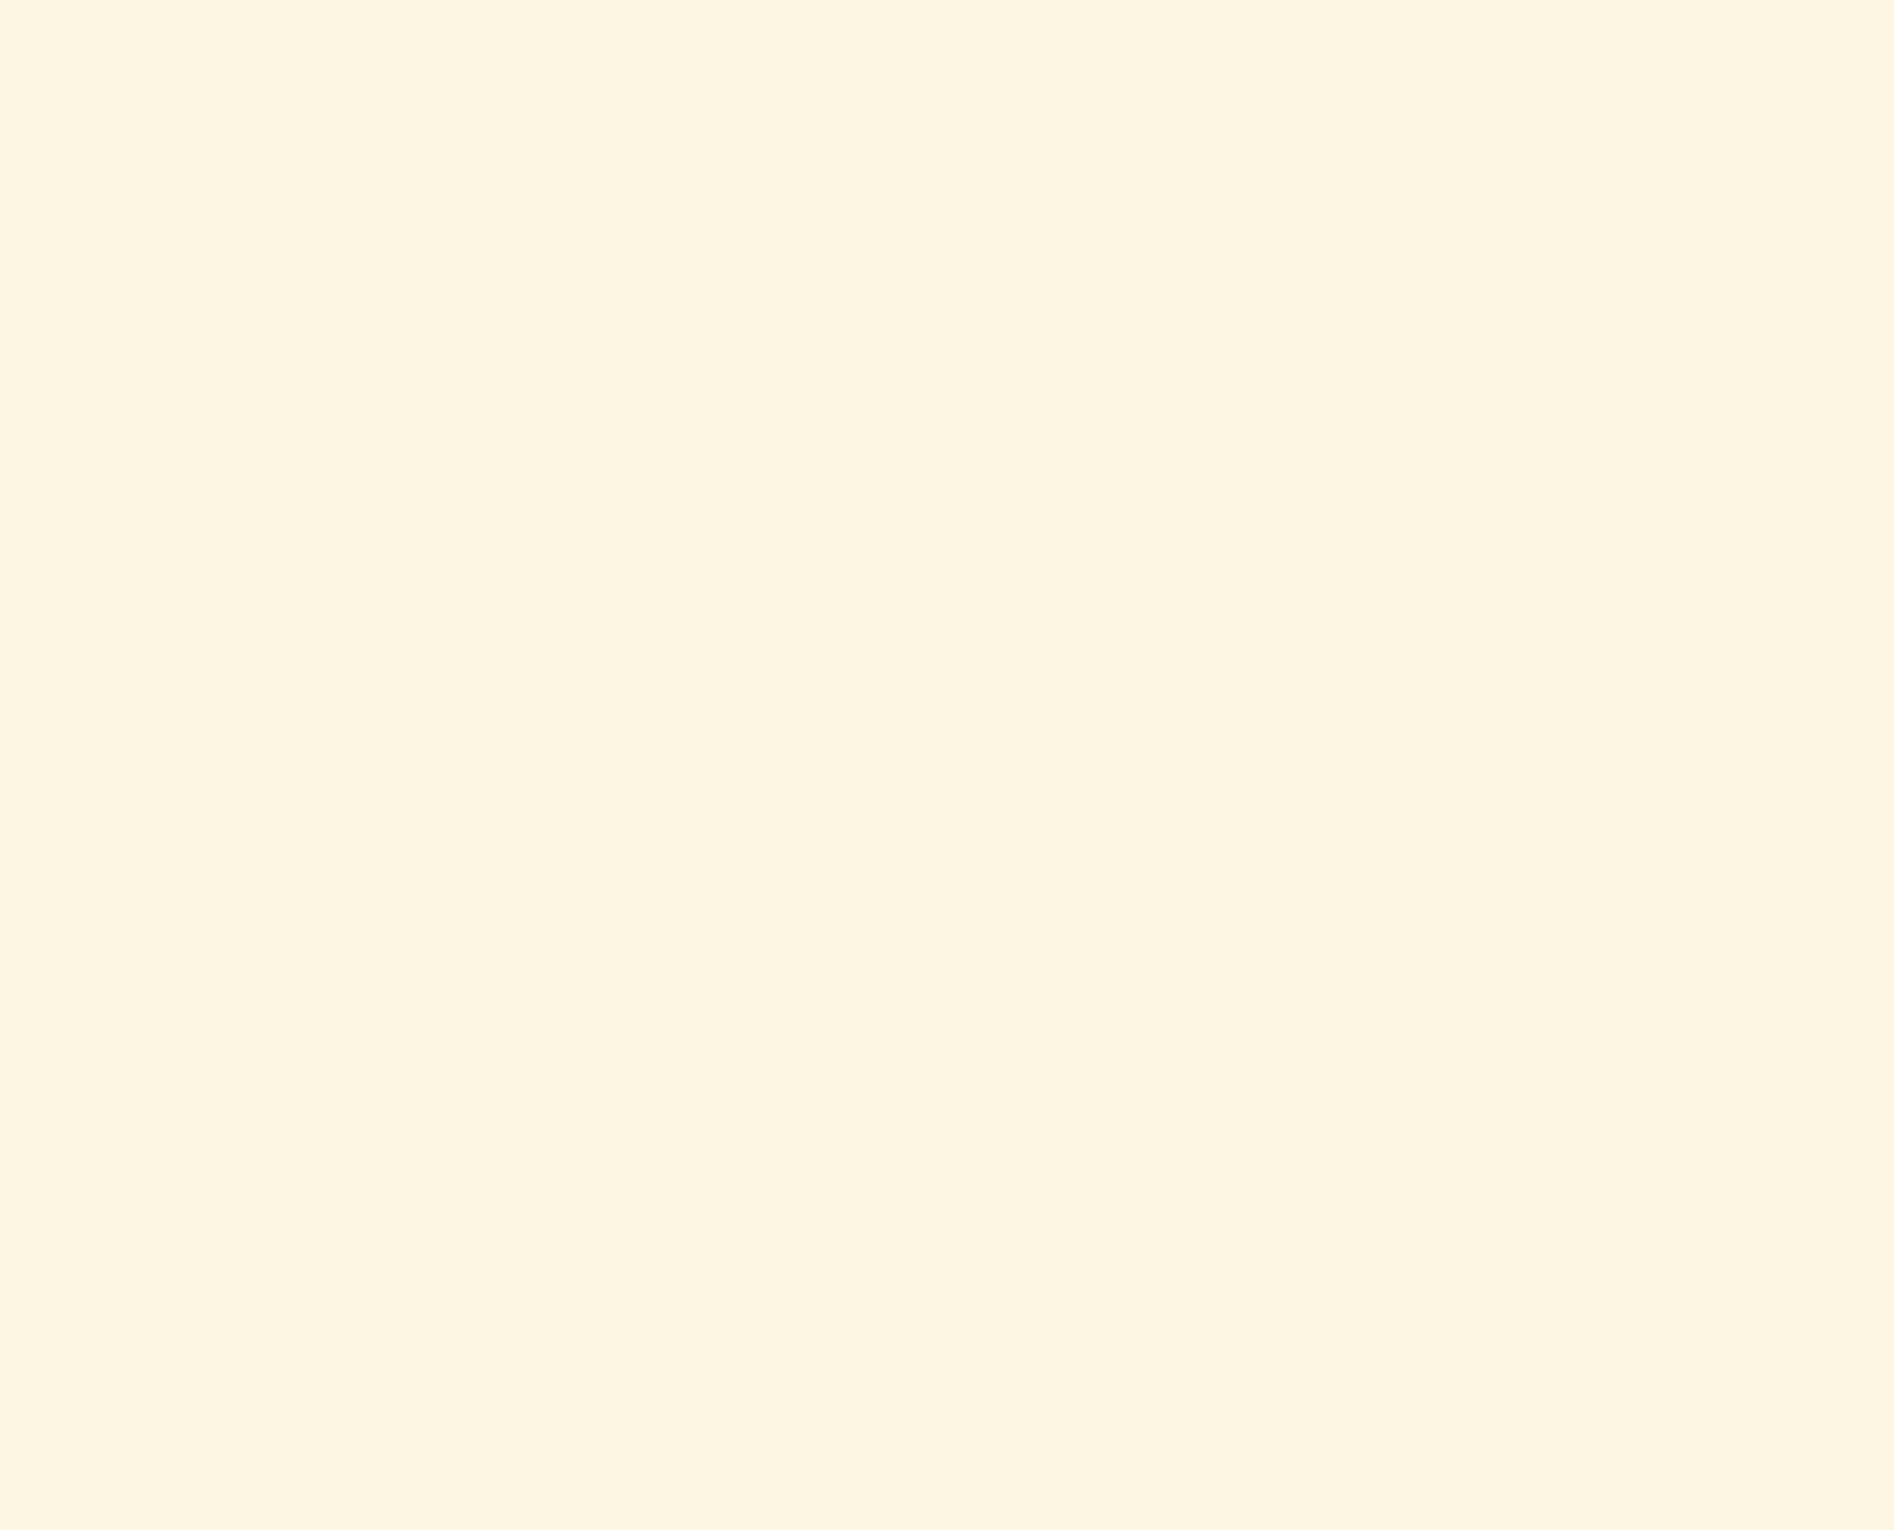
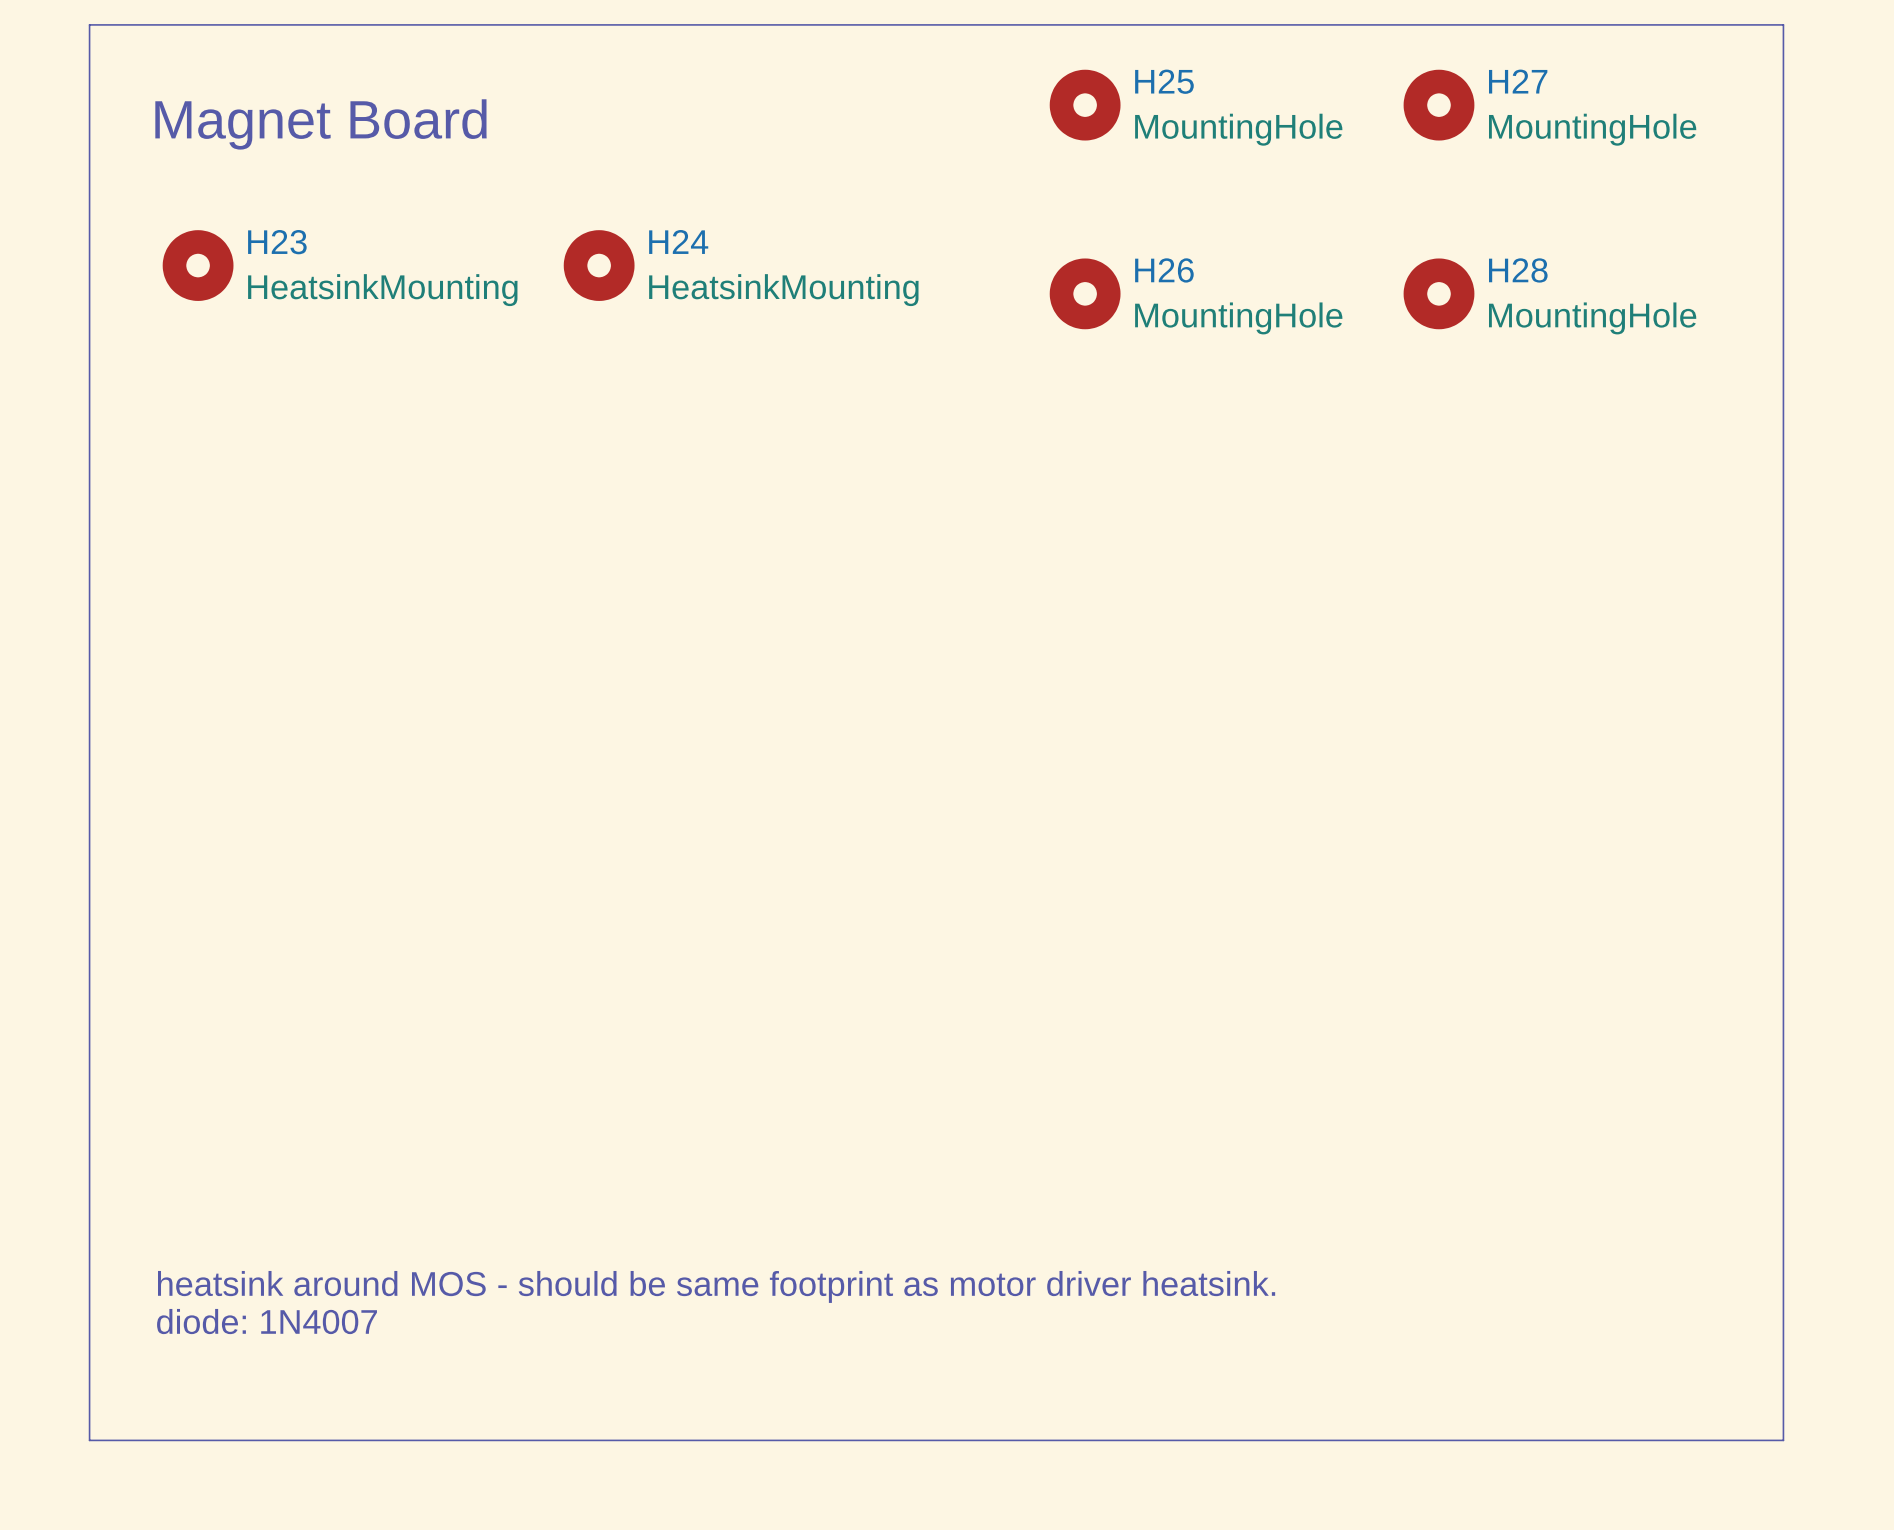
line: none -> (89, 24) (1783, 24) (1783, 1440) (89, 1440) (89, 24)
H25: none -> MountingHole (1085, 105)
H27: none -> MountingHole (1439, 105)
text: none -> Magnet Board (320, 124)
H23: none -> HeatsinkMounting (198, 265)
H24: none -> HeatsinkMounting (599, 265)
H26: none -> MountingHole (1085, 293)
H28: none -> MountingHole (1439, 293)
text: none -> heatsink around MOS - should be same footprint as motor driver heatsink. (716, 1286)
text: none -> diode: 1N4007 (267, 1321)

